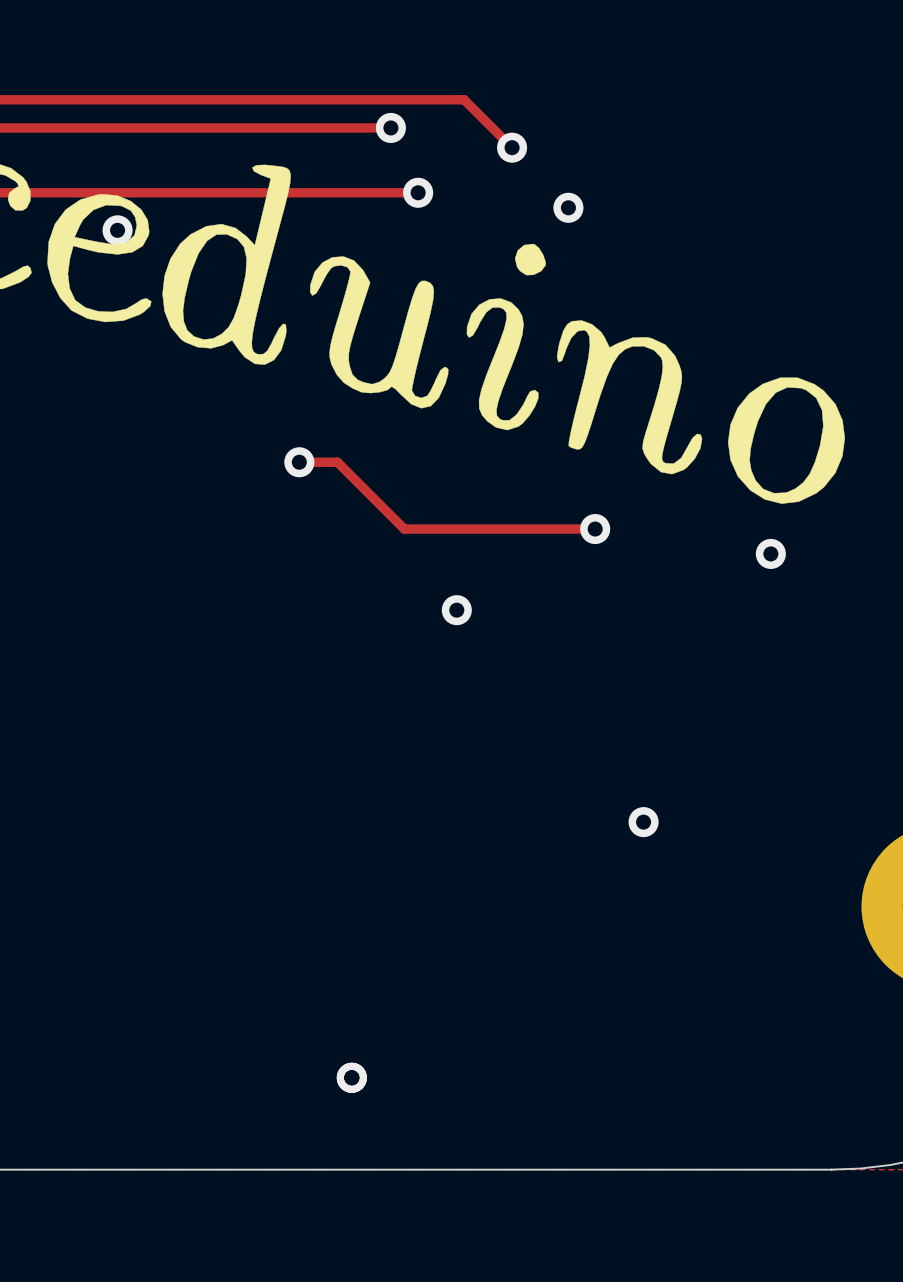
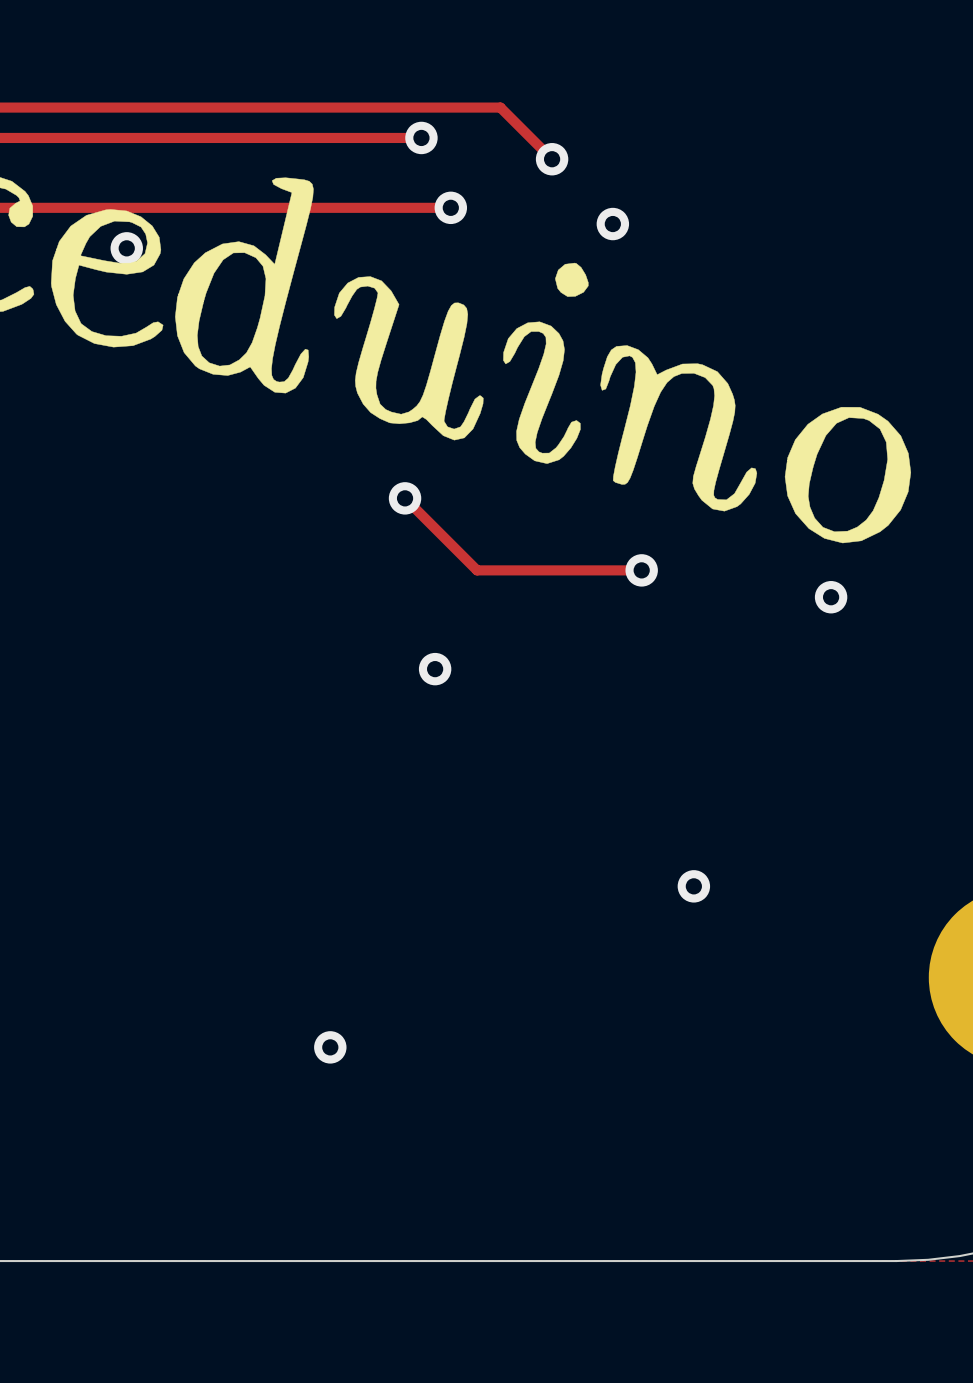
track: (299, 462) (337, 462) (404, 529) (442, 529) -> (405, 498) (477, 570)
via position: (299, 462) -> (405, 498)
via position: (456, 610) -> (435, 669)
via position: (351, 1077) -> (330, 1047)

